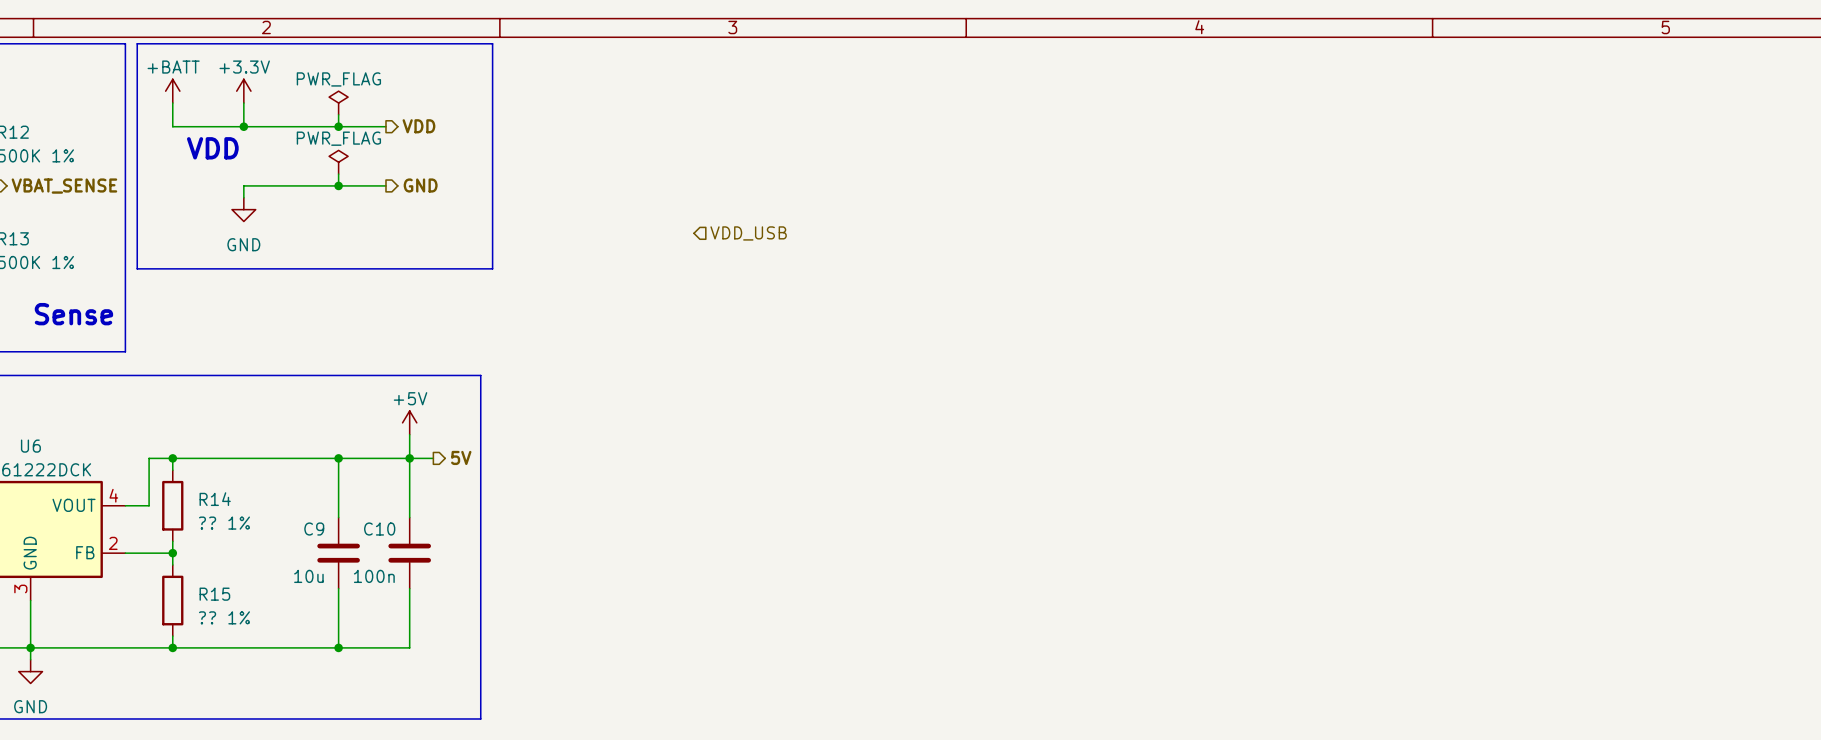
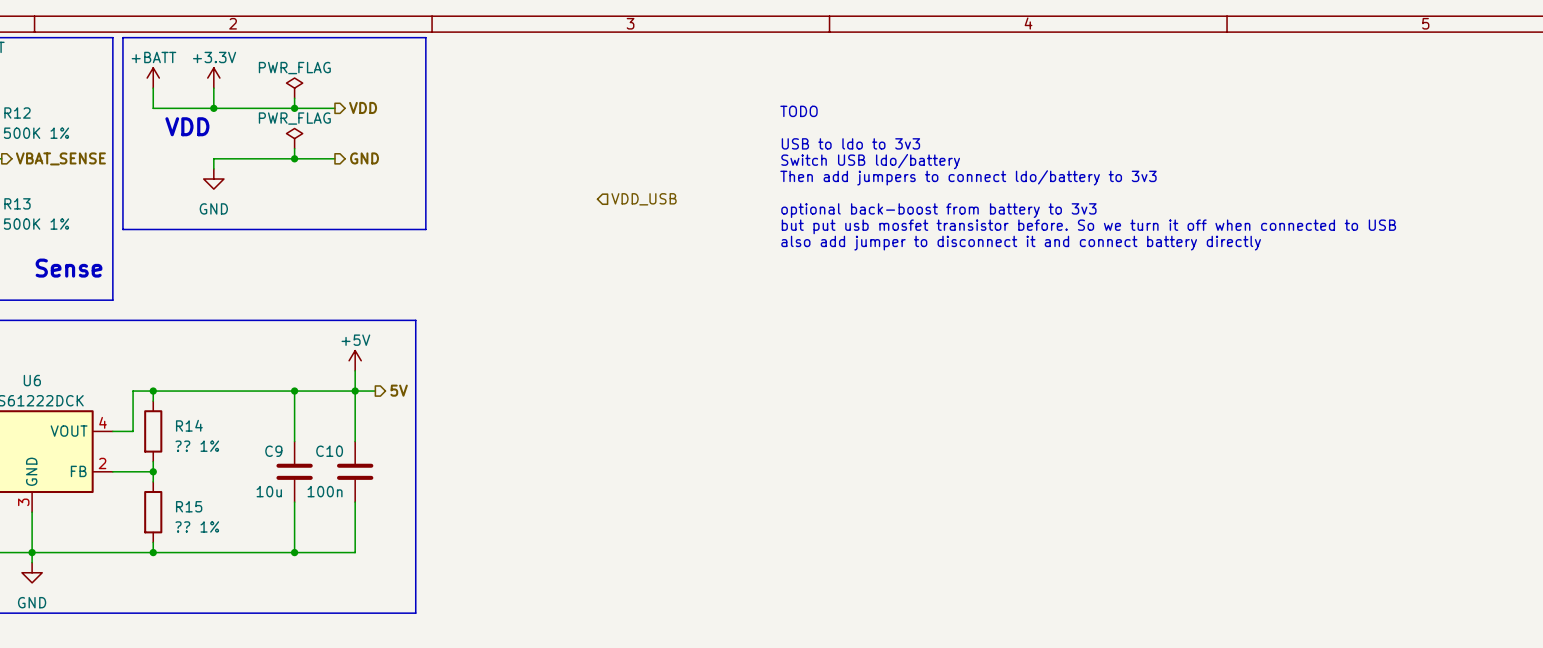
text: none -> TODO (799, 111)
text: none -> USB to ldo to 3v3 (850, 143)
text: none -> Switch USB ldo/battery (870, 161)
text: none -> Then add jumpers to connect ldo/battery to 3v3 (968, 177)
text: none -> optional back-boost from battery to 3v3 (938, 210)
text: none -> but put usb mosfet transistor before. So we turn it off when connected to USB (1088, 226)
text: none -> also add jumper to disconnect it and connect battery directly (1021, 243)

